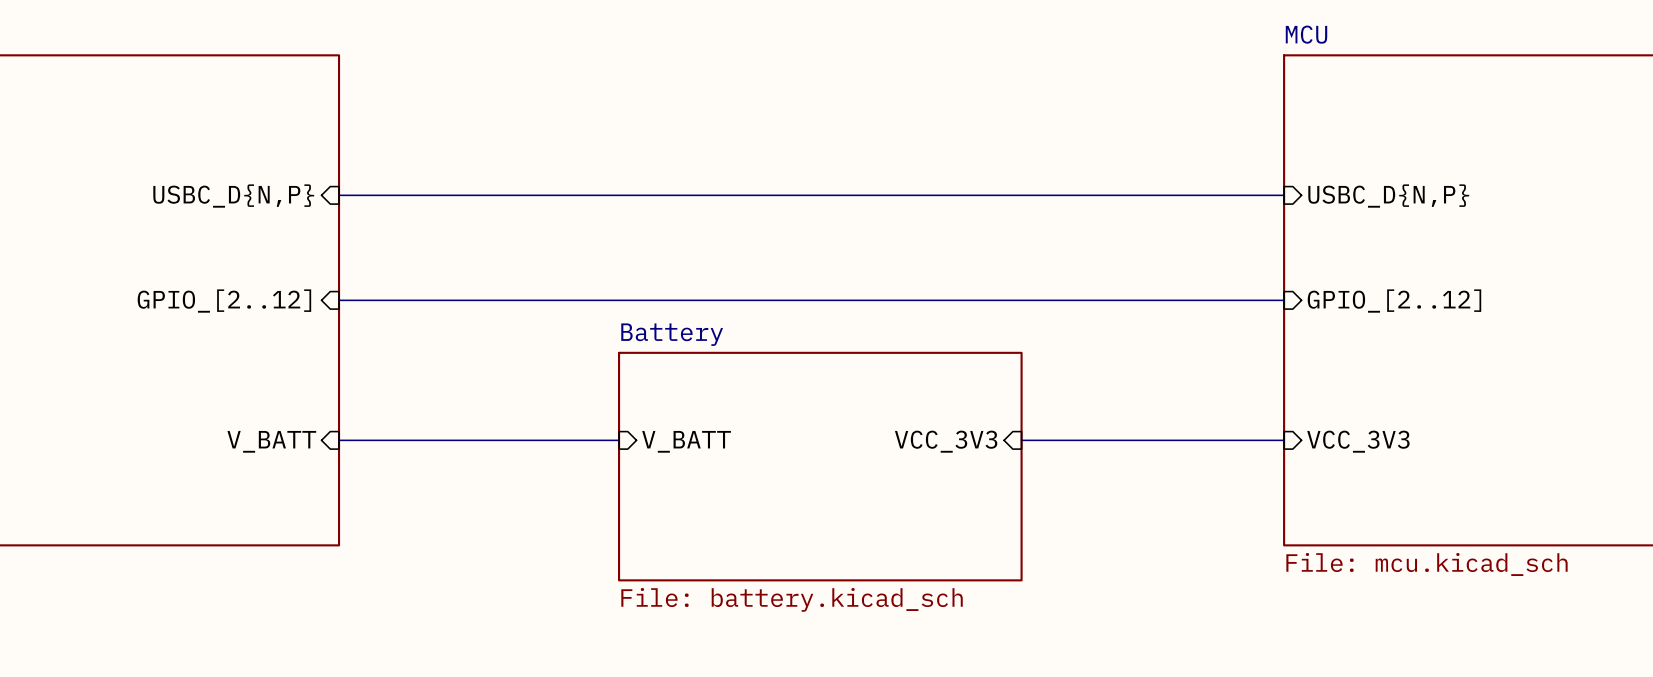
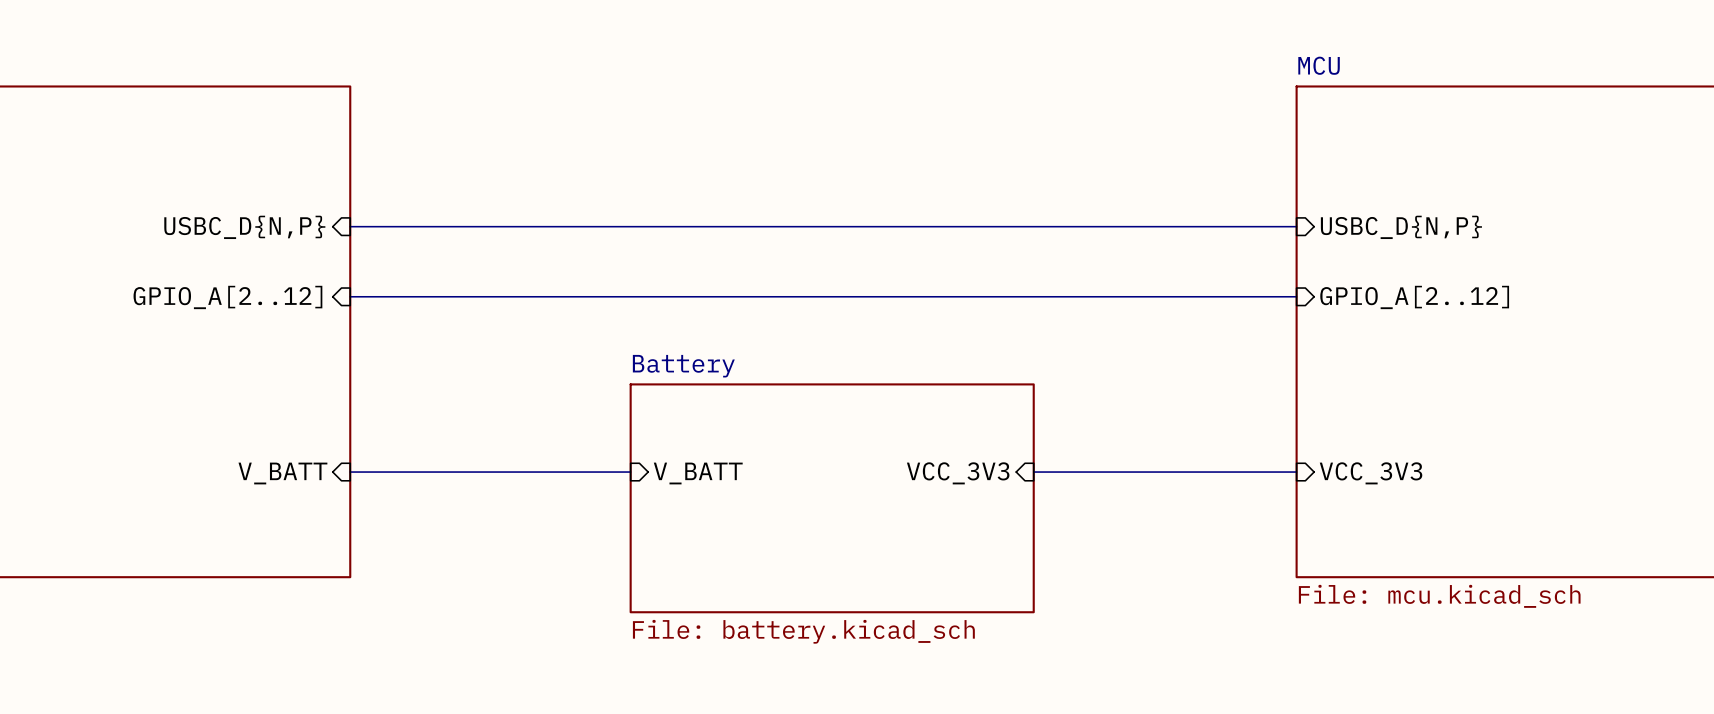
bus: (339, 300) (1284, 300) -> (350, 296) (1296, 296)
sheet pin: GPIO_[2..12] (224, 301) -> GPIO_A[2..12] (227, 297)
sheet pin: GPIO_[2..12] (1394, 301) -> GPIO_A[2..12] (1414, 297)

